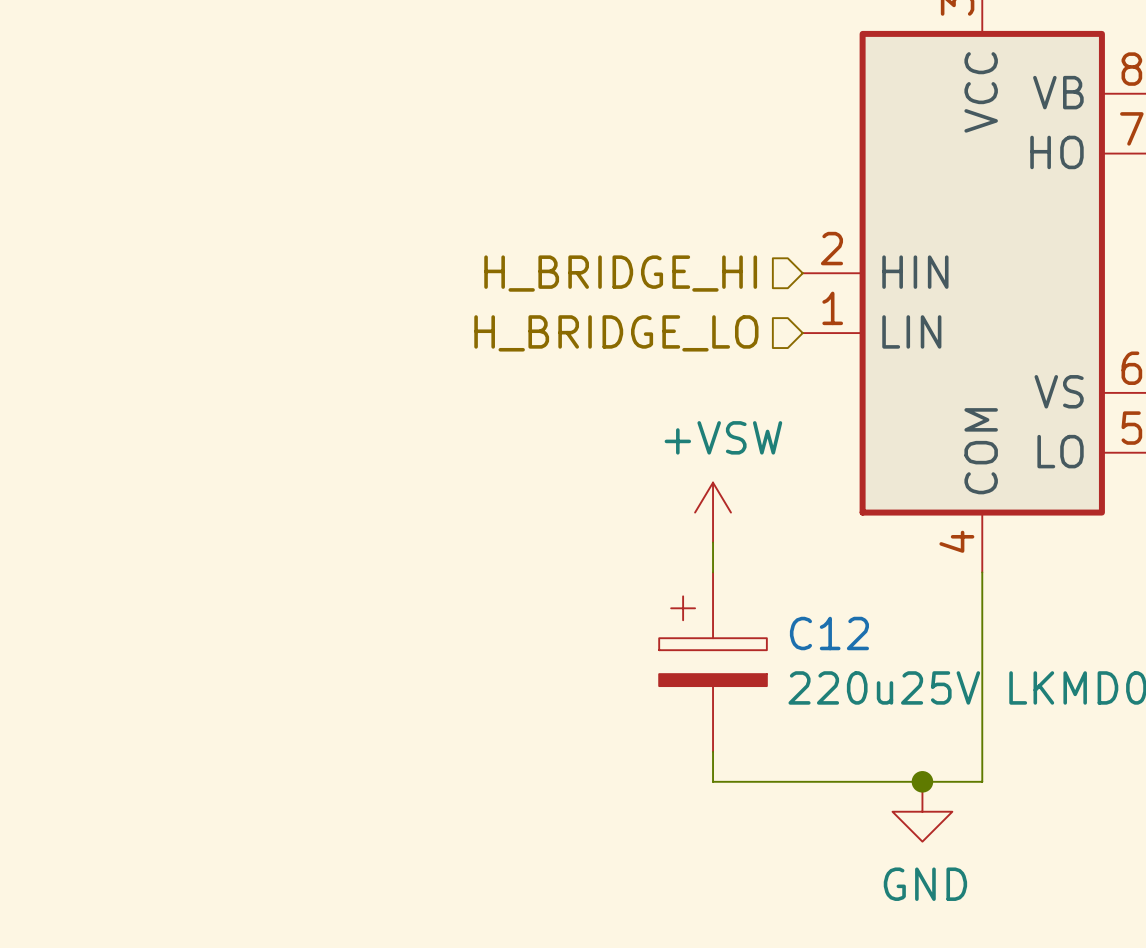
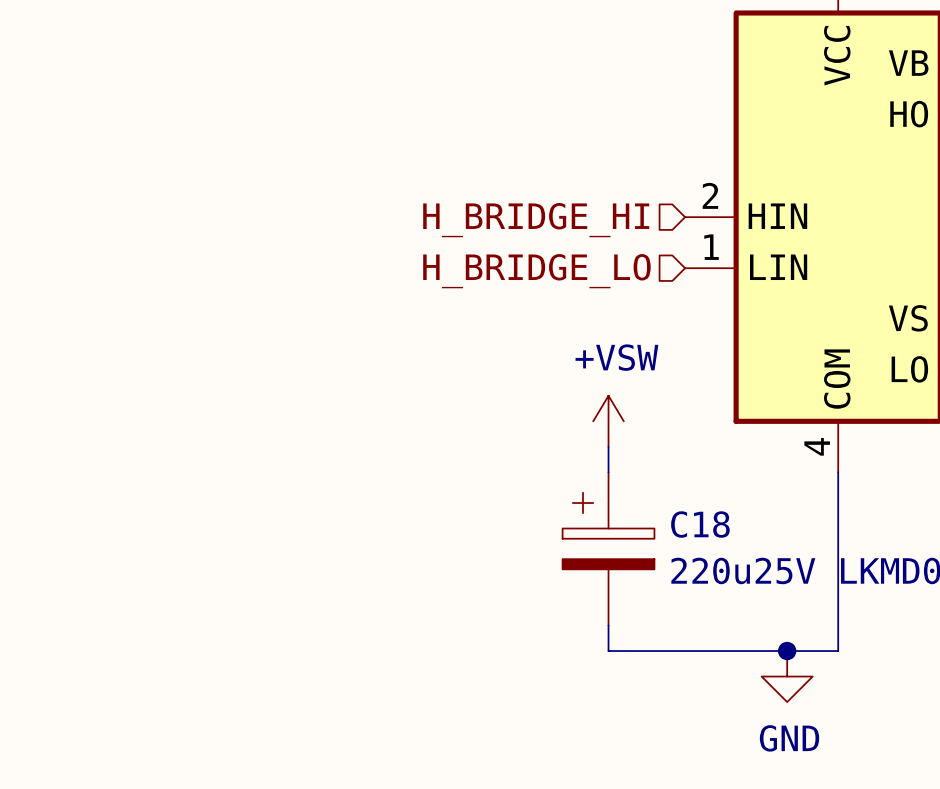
C12 name: C12 (829, 633) -> C18 (700, 524)

